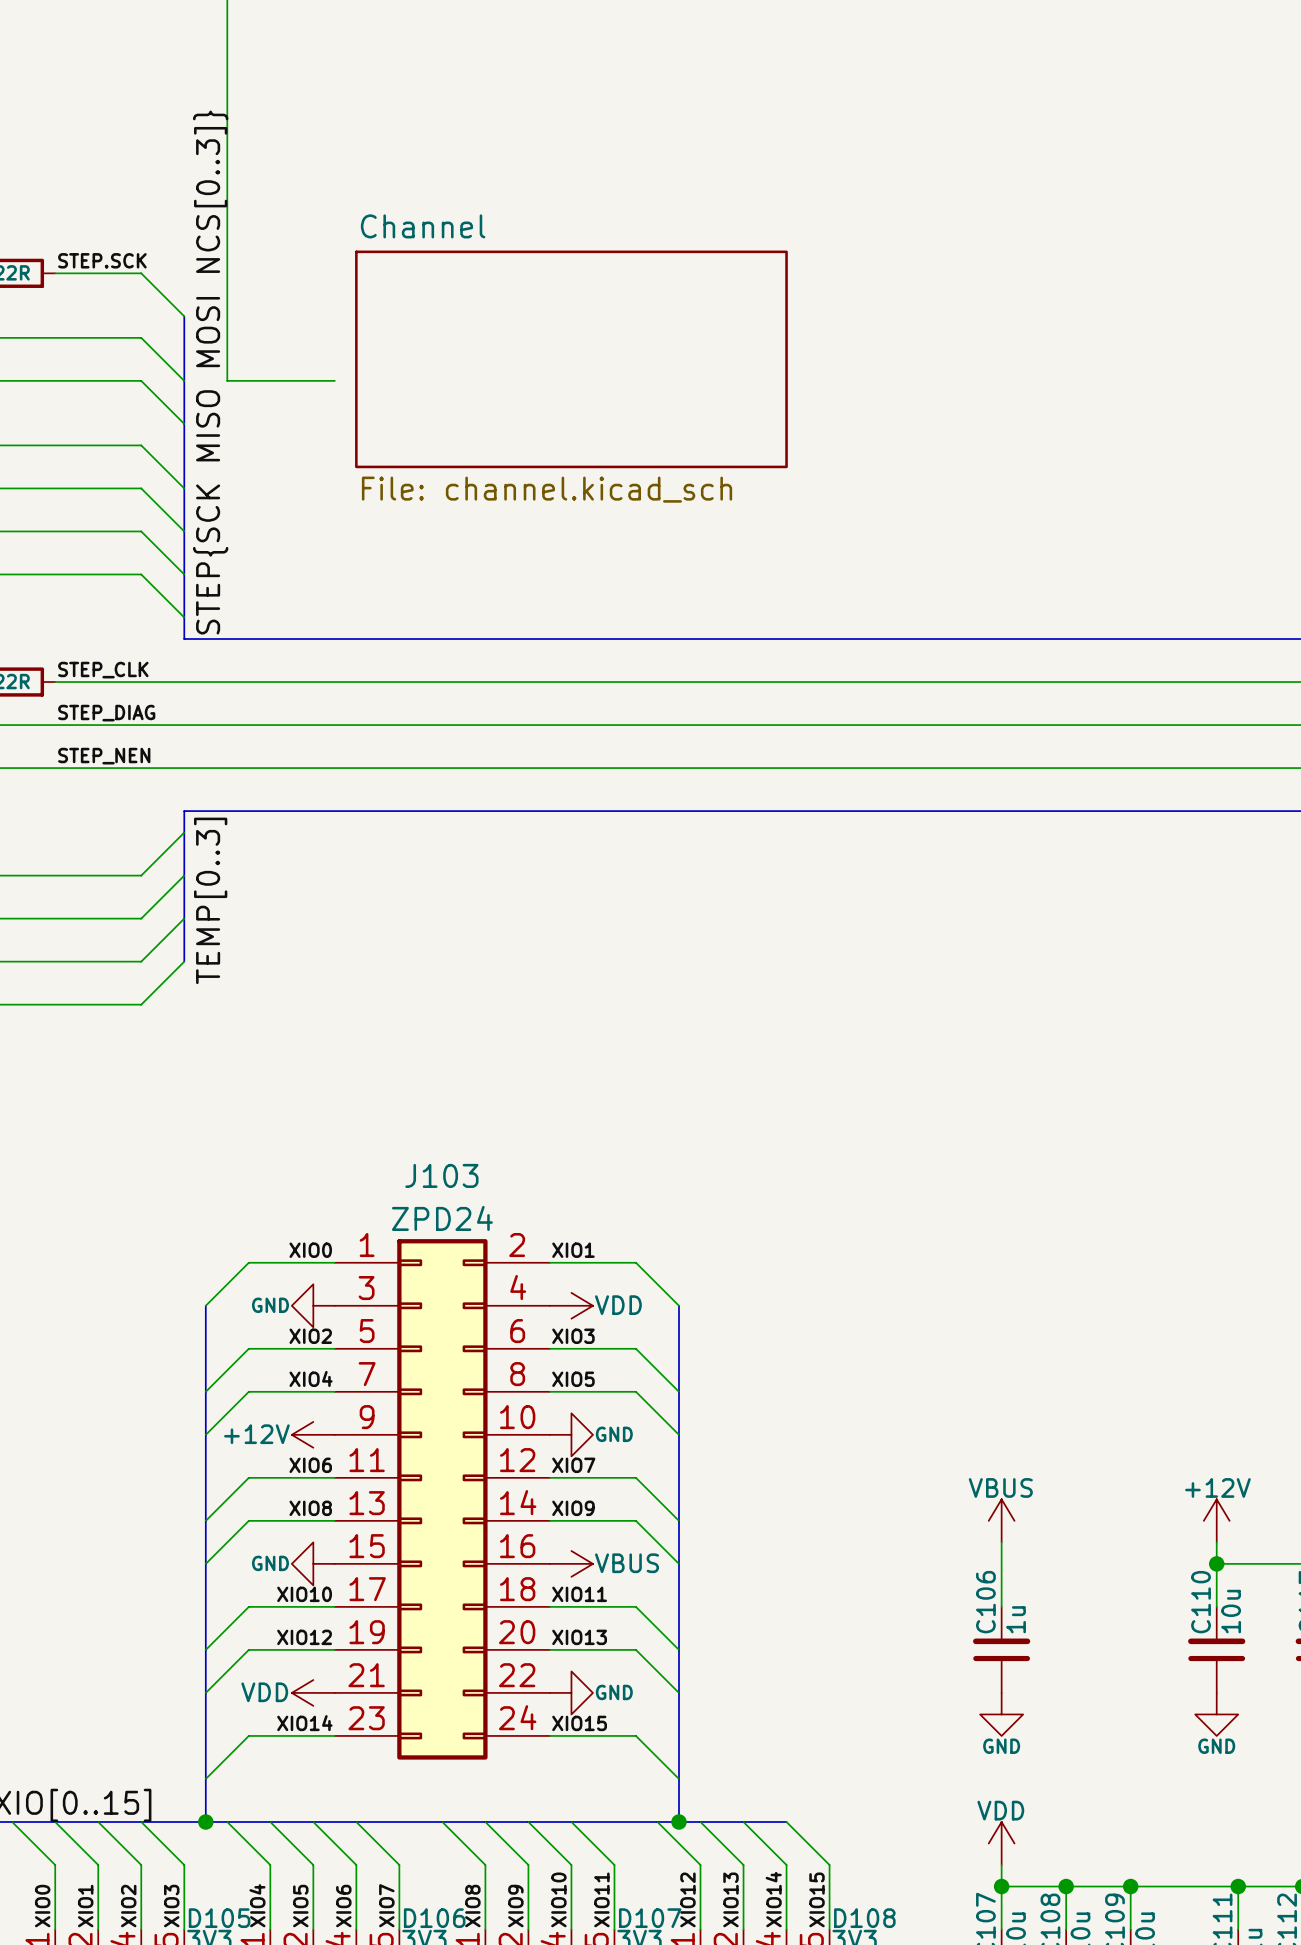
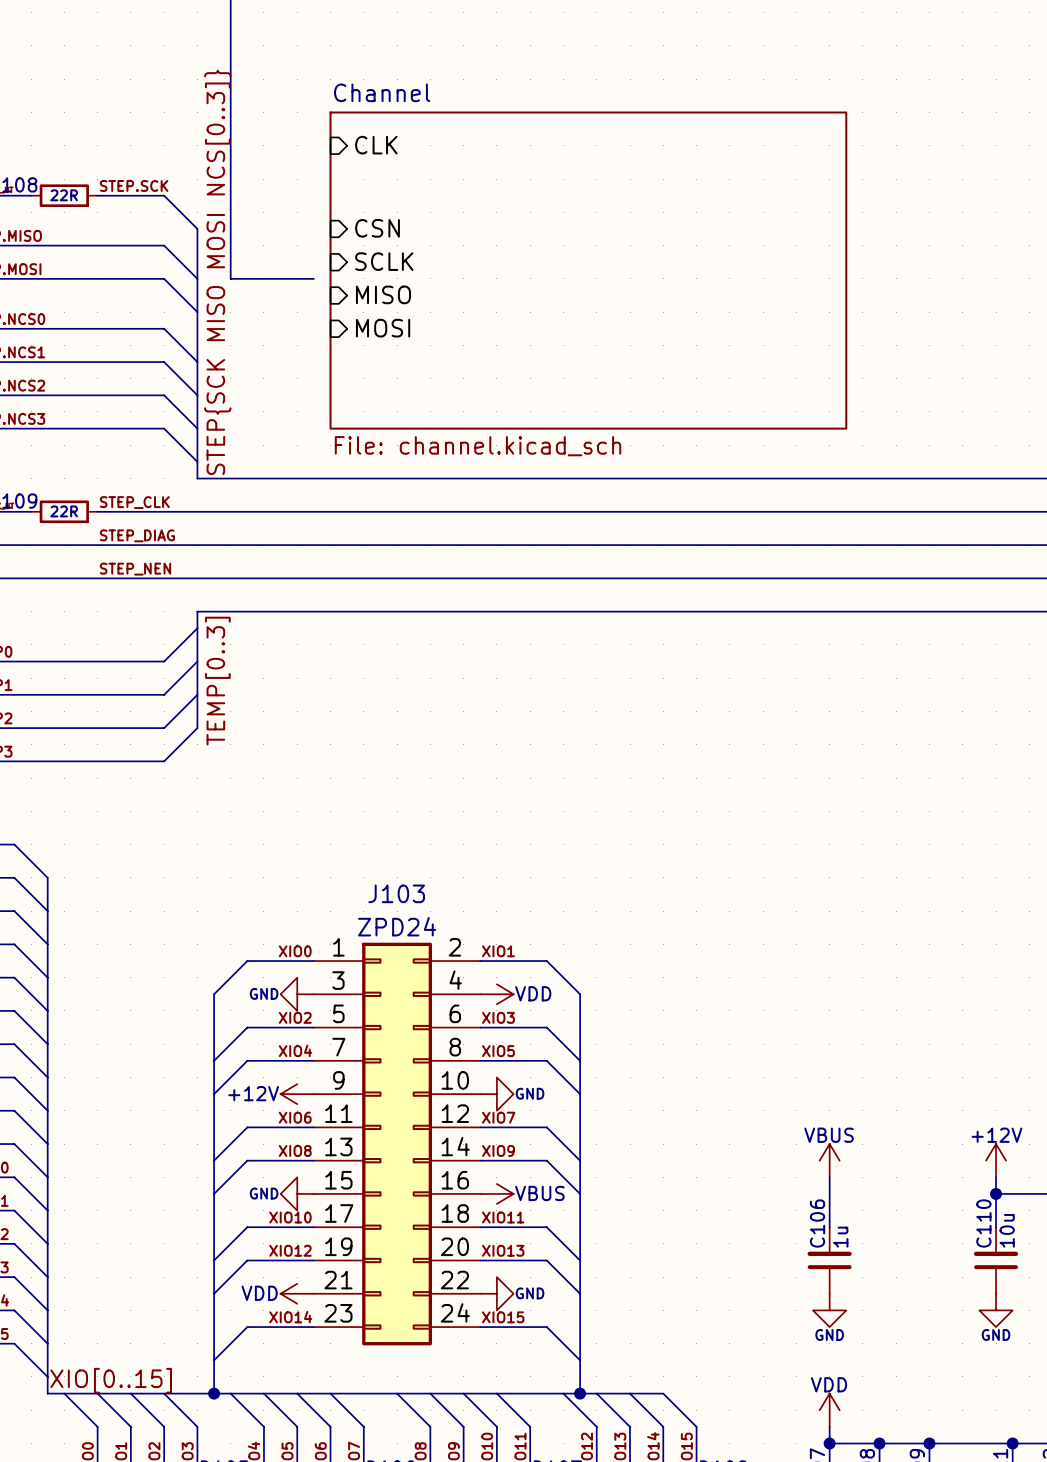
sheet pin: none -> CLK (376, 145)
sheet pin: none -> CSN (377, 228)
sheet pin: none -> SCLK (384, 261)
sheet Channel: File: channel.kicad_sch (571, 359) -> none
sheet Channel: none -> File: channel.kicad_sch (588, 270)
sheet pin: none -> MISO (383, 294)
sheet pin: none -> MOSI (383, 328)

